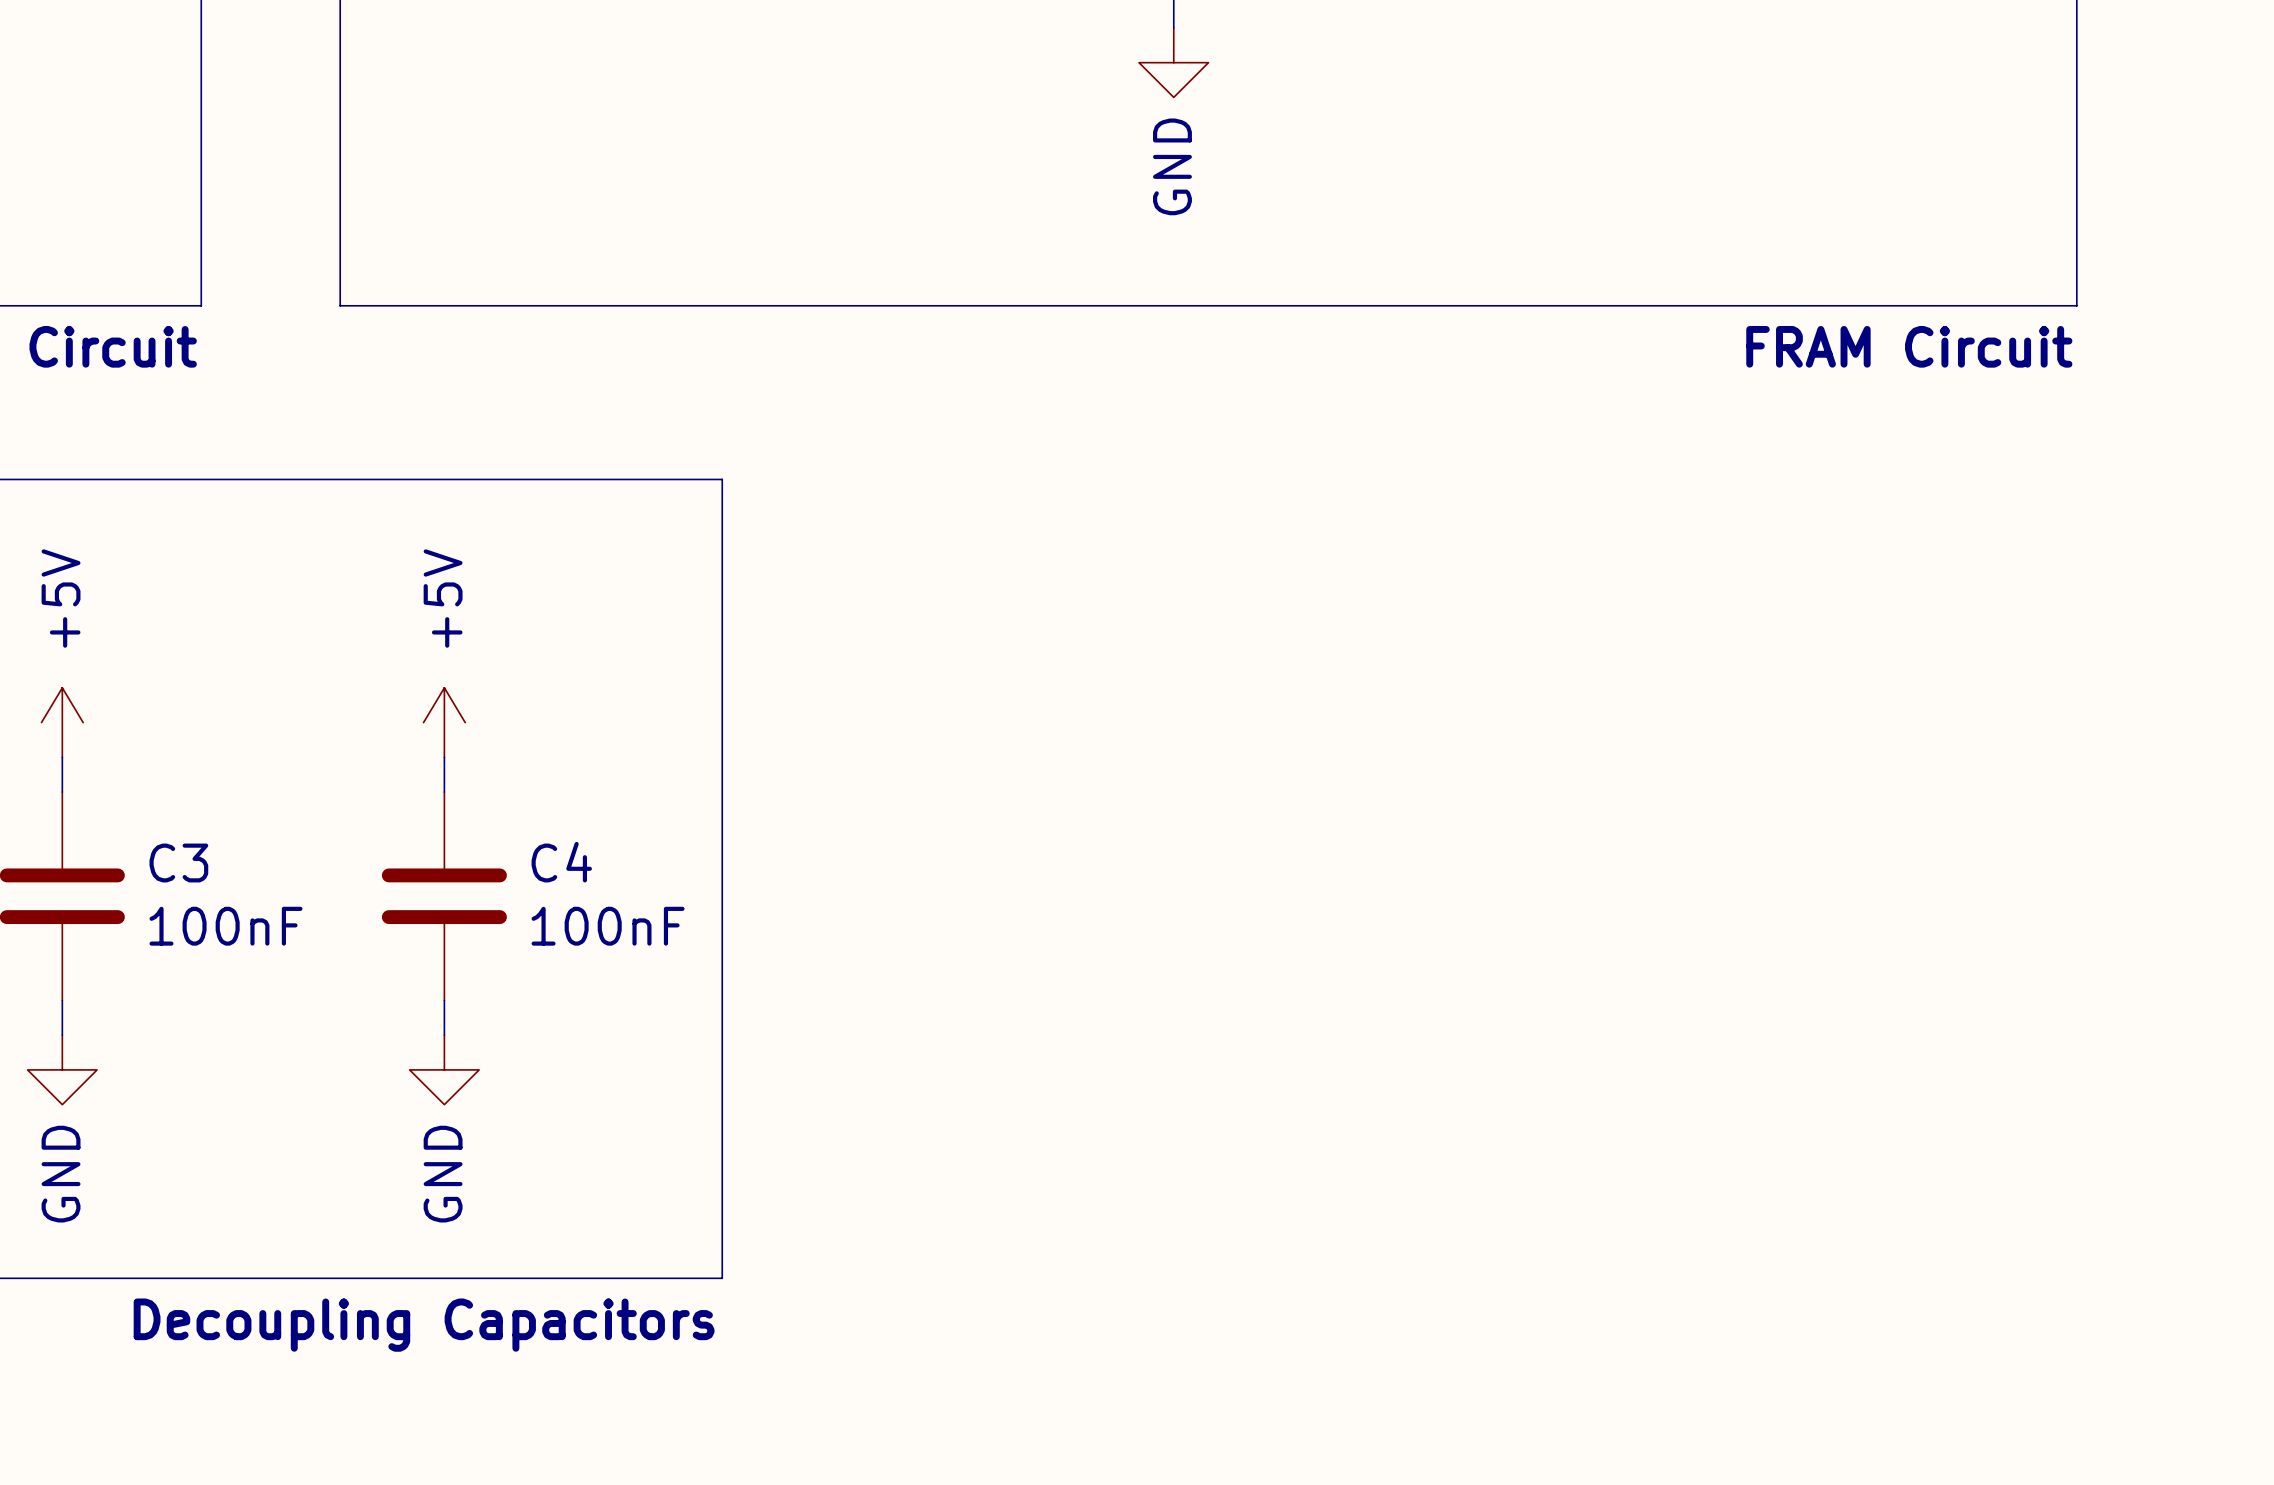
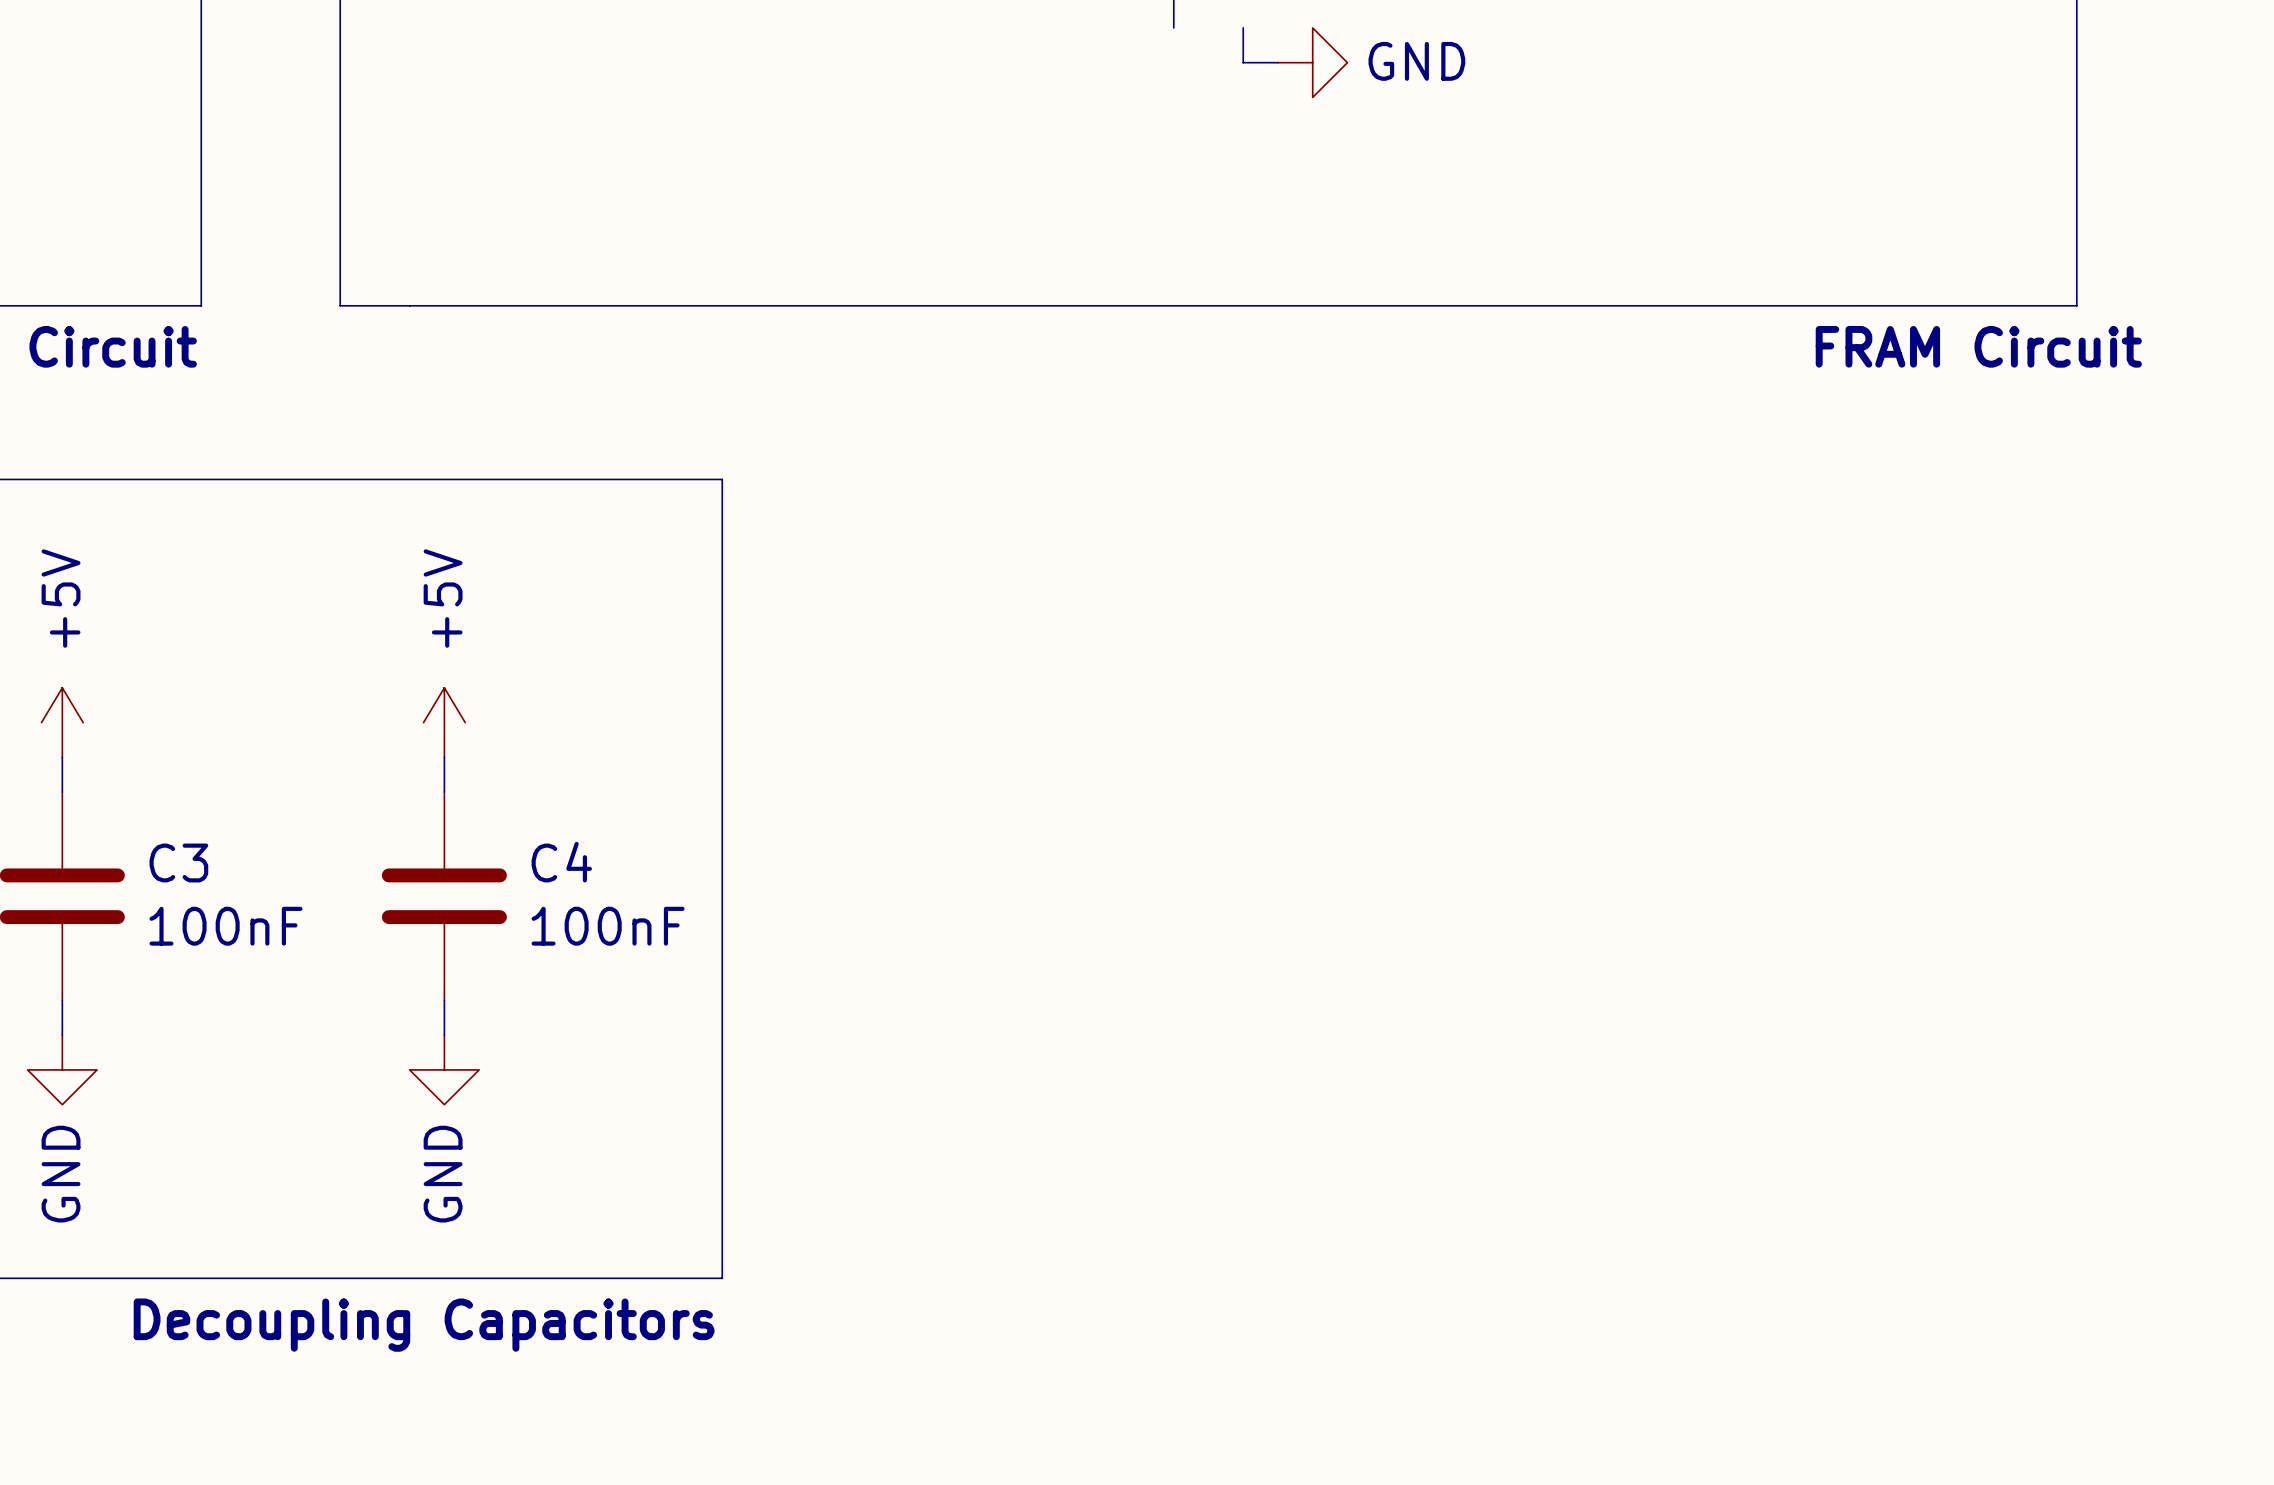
wire: none -> (1243, 27) (1243, 62) (1277, 62)
power symbol rotation: 0° (1173, 62) -> 90° counterclockwise (1312, 62)
power symbol position: GND (1173, 62) -> GND (1312, 62)
text position: FRAM Circuit (1909, 346) -> FRAM Circuit (1978, 346)

